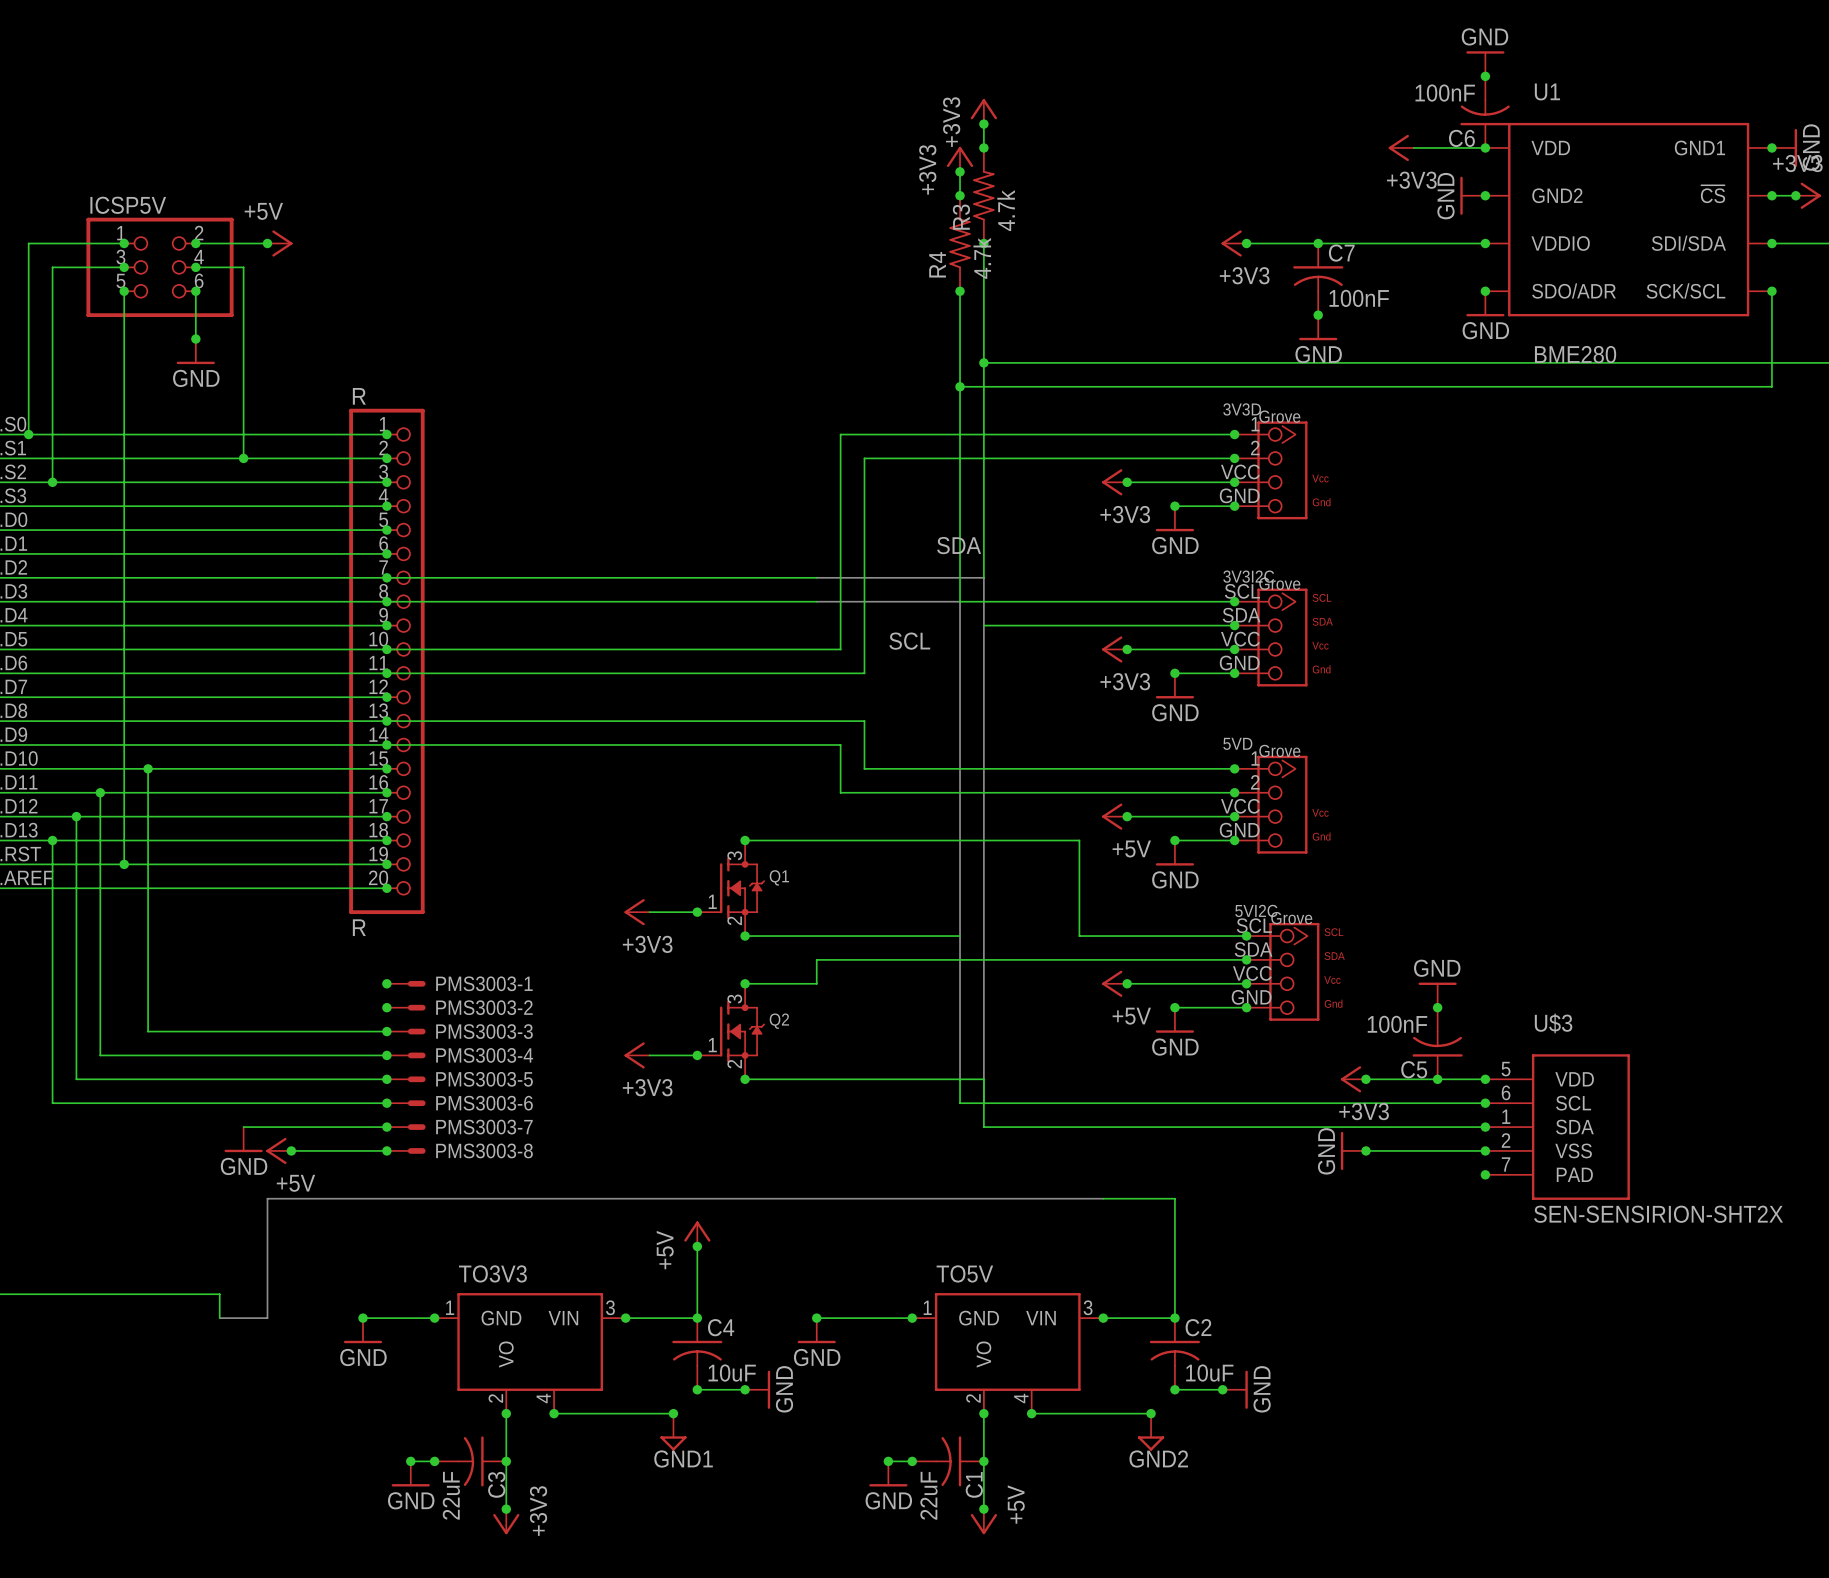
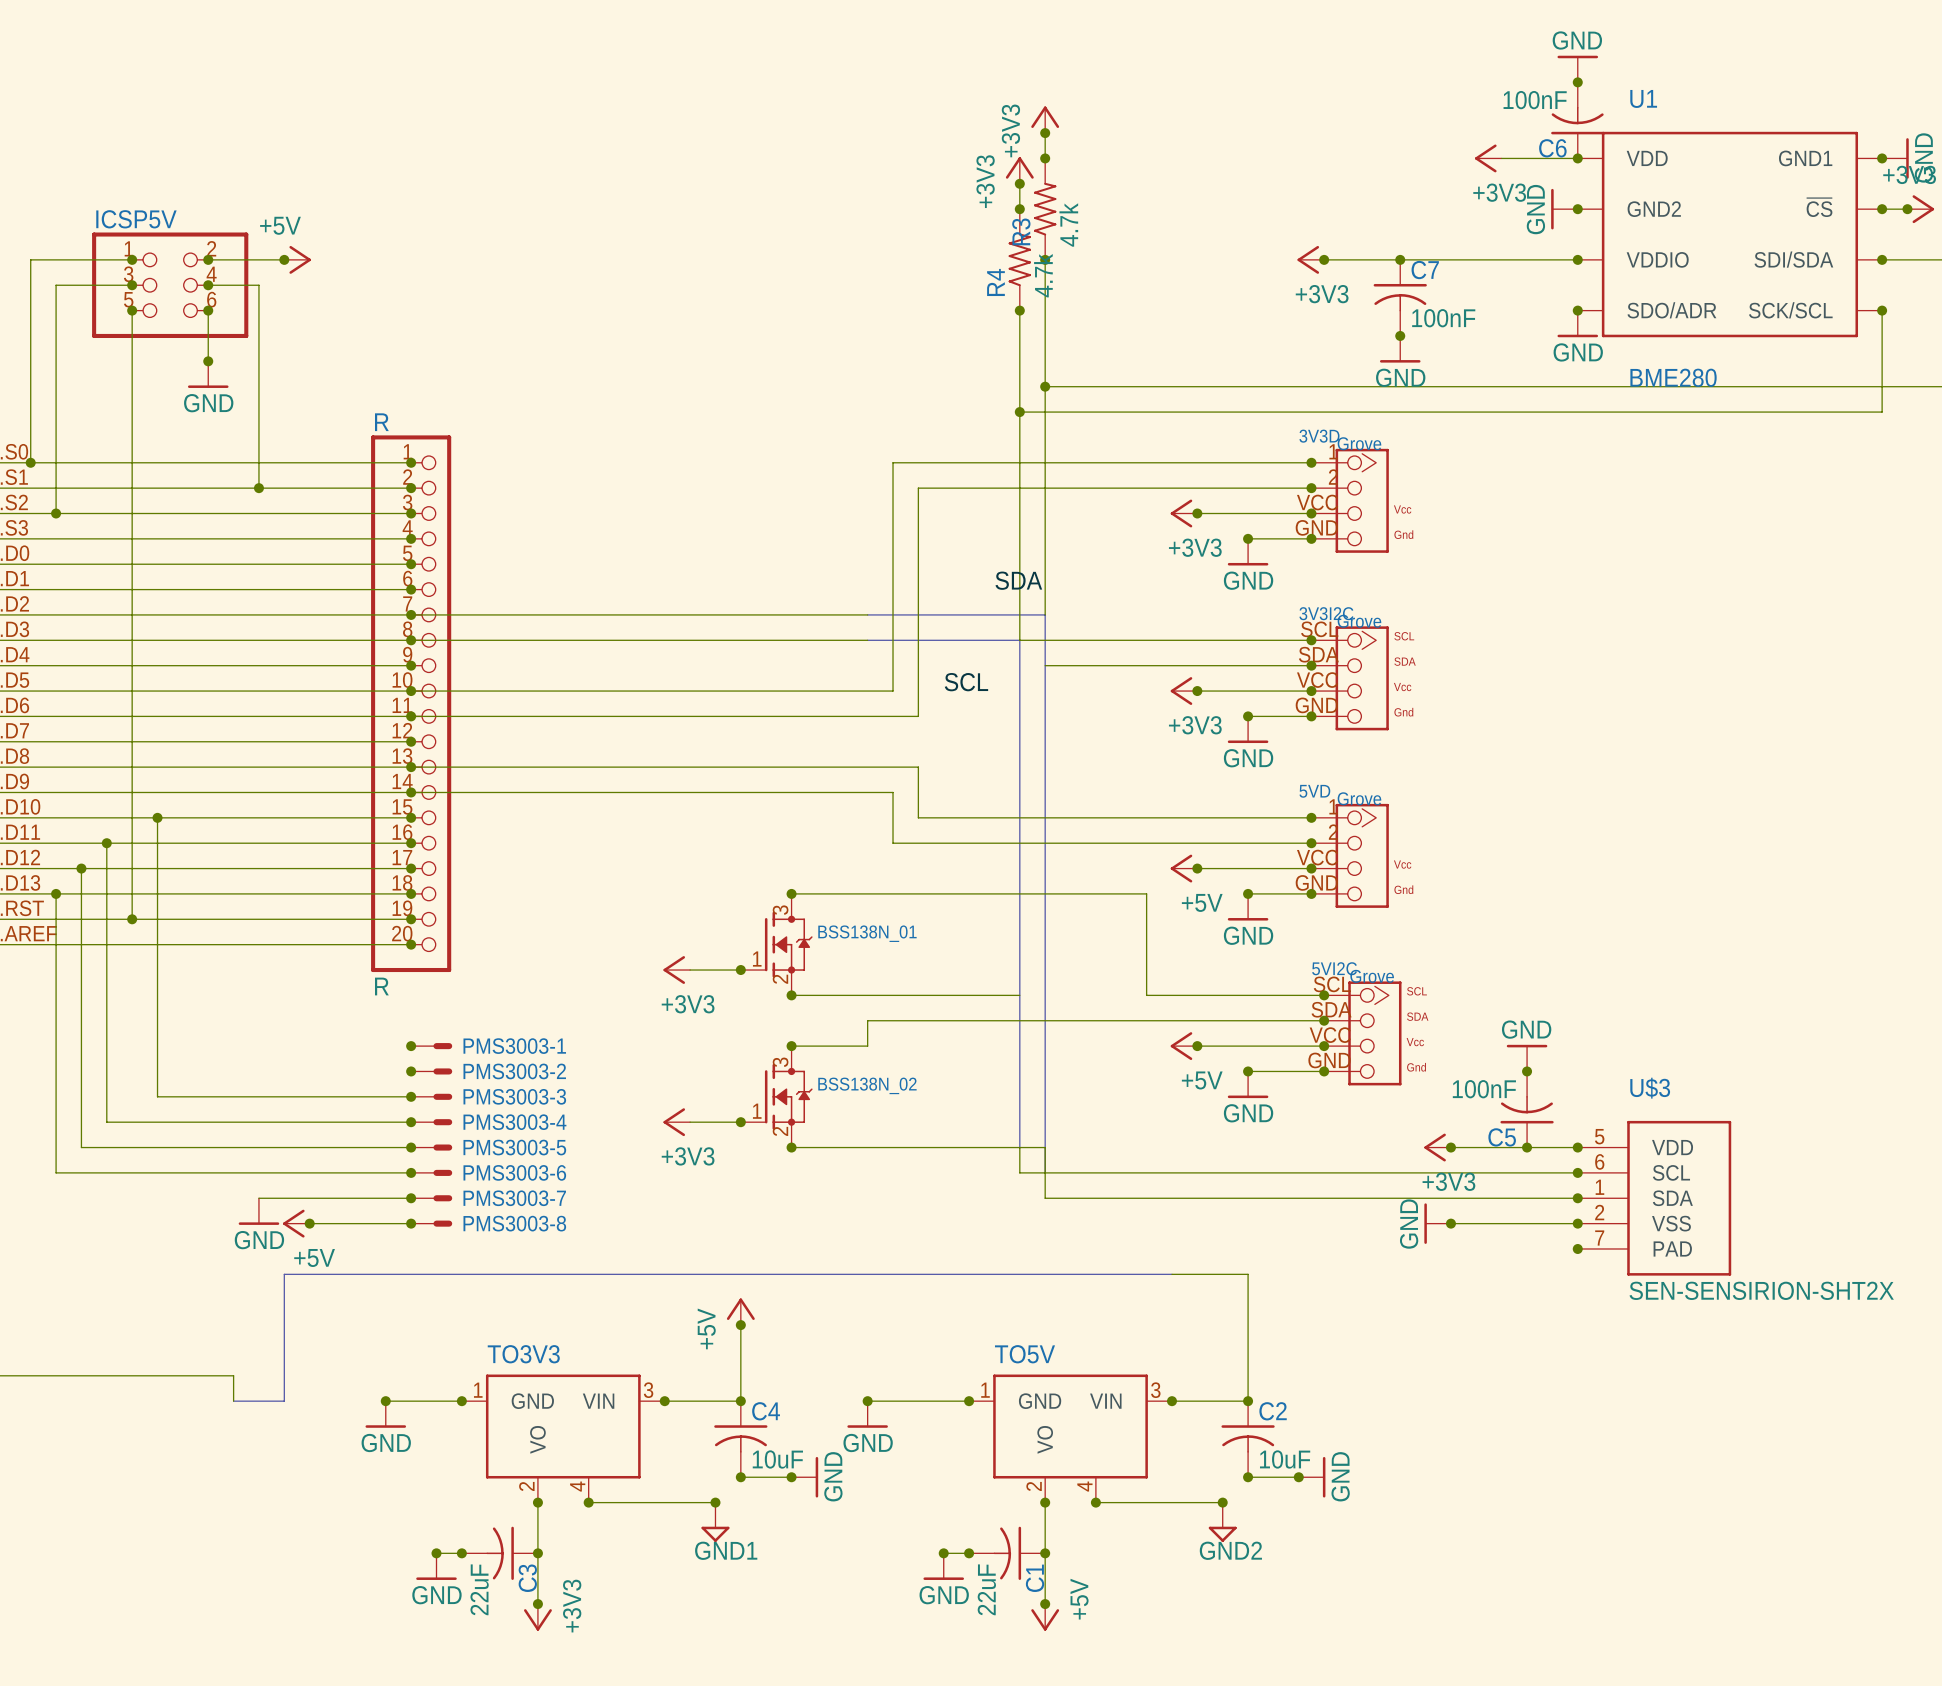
Q1 name: Q1 (779, 877) -> BSS138N_01 (867, 933)
Q2 name: Q2 (779, 1021) -> BSS138N_02 (867, 1085)

